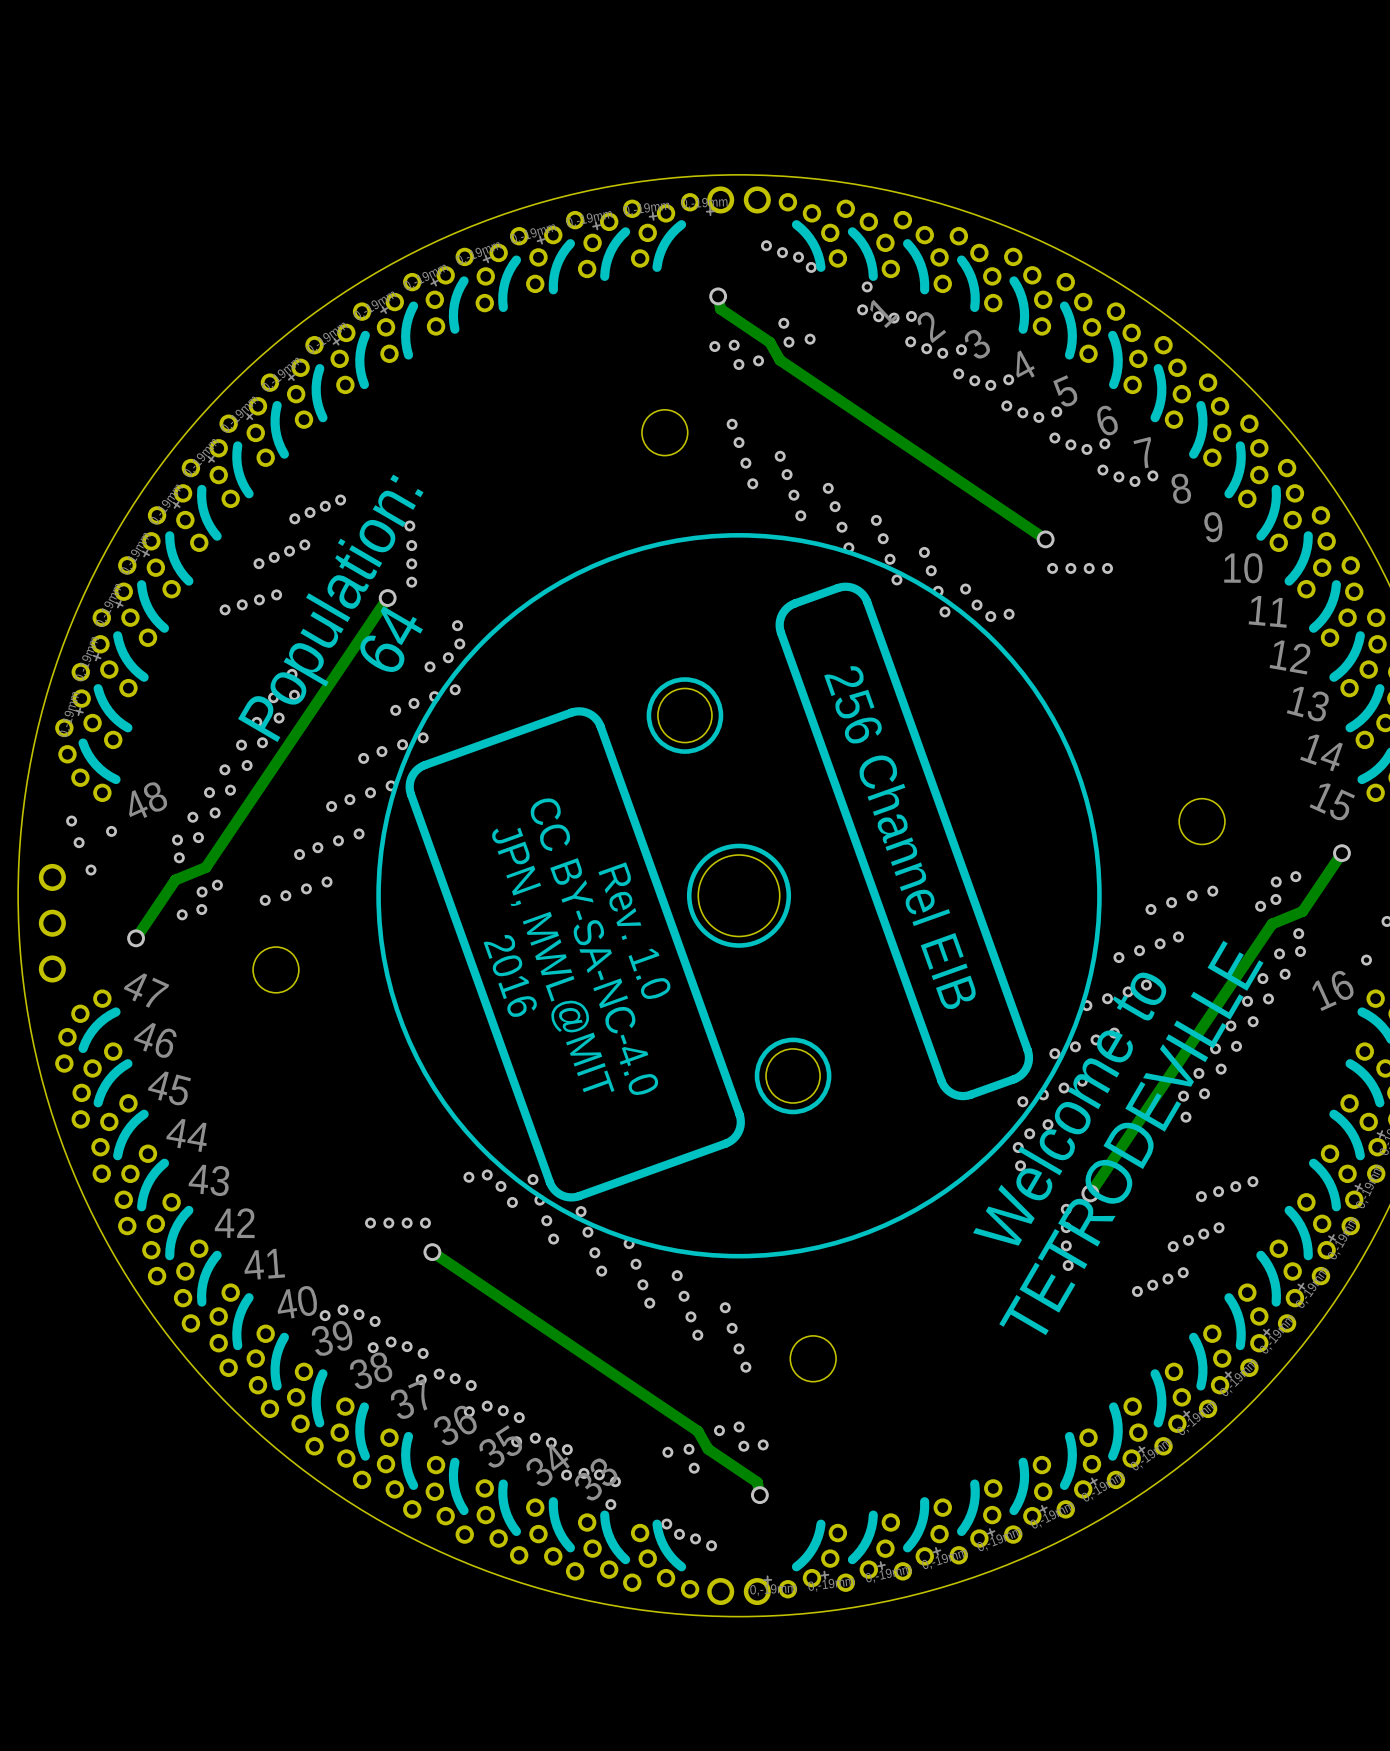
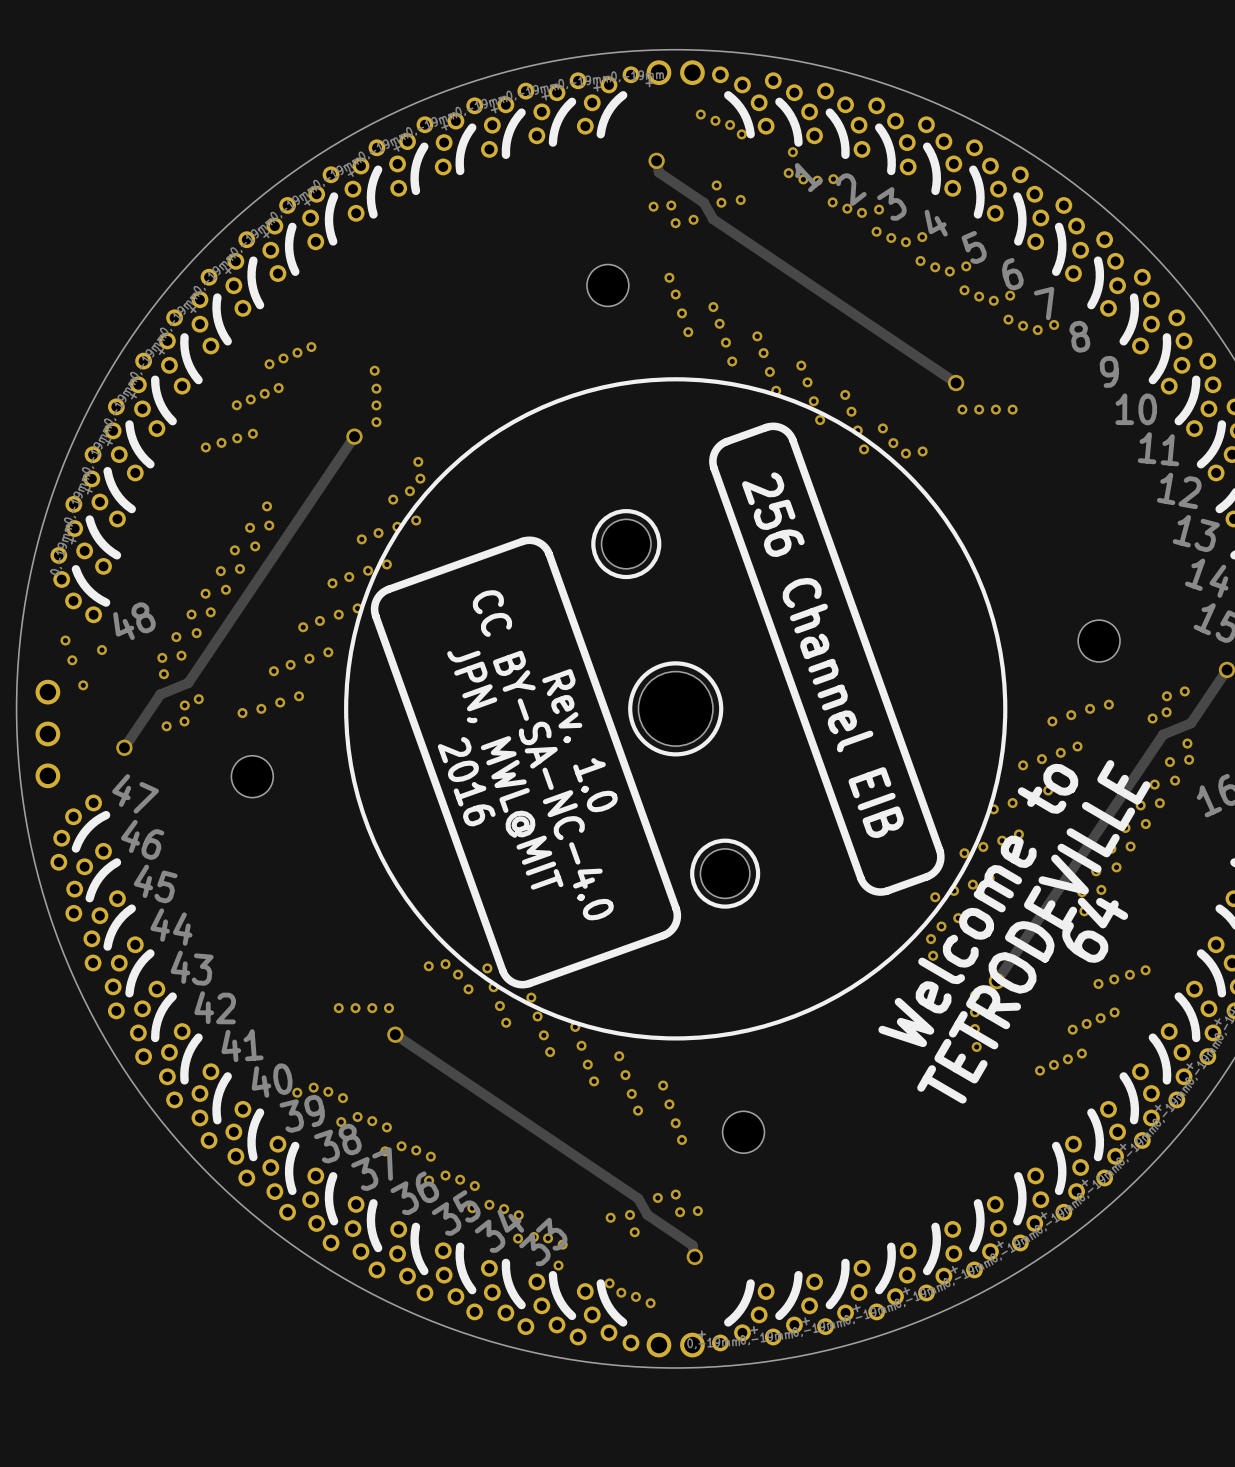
text: Population: (330, 608) -> none
text: 64 (390, 639) -> none
text: none -> 64 (1095, 930)

